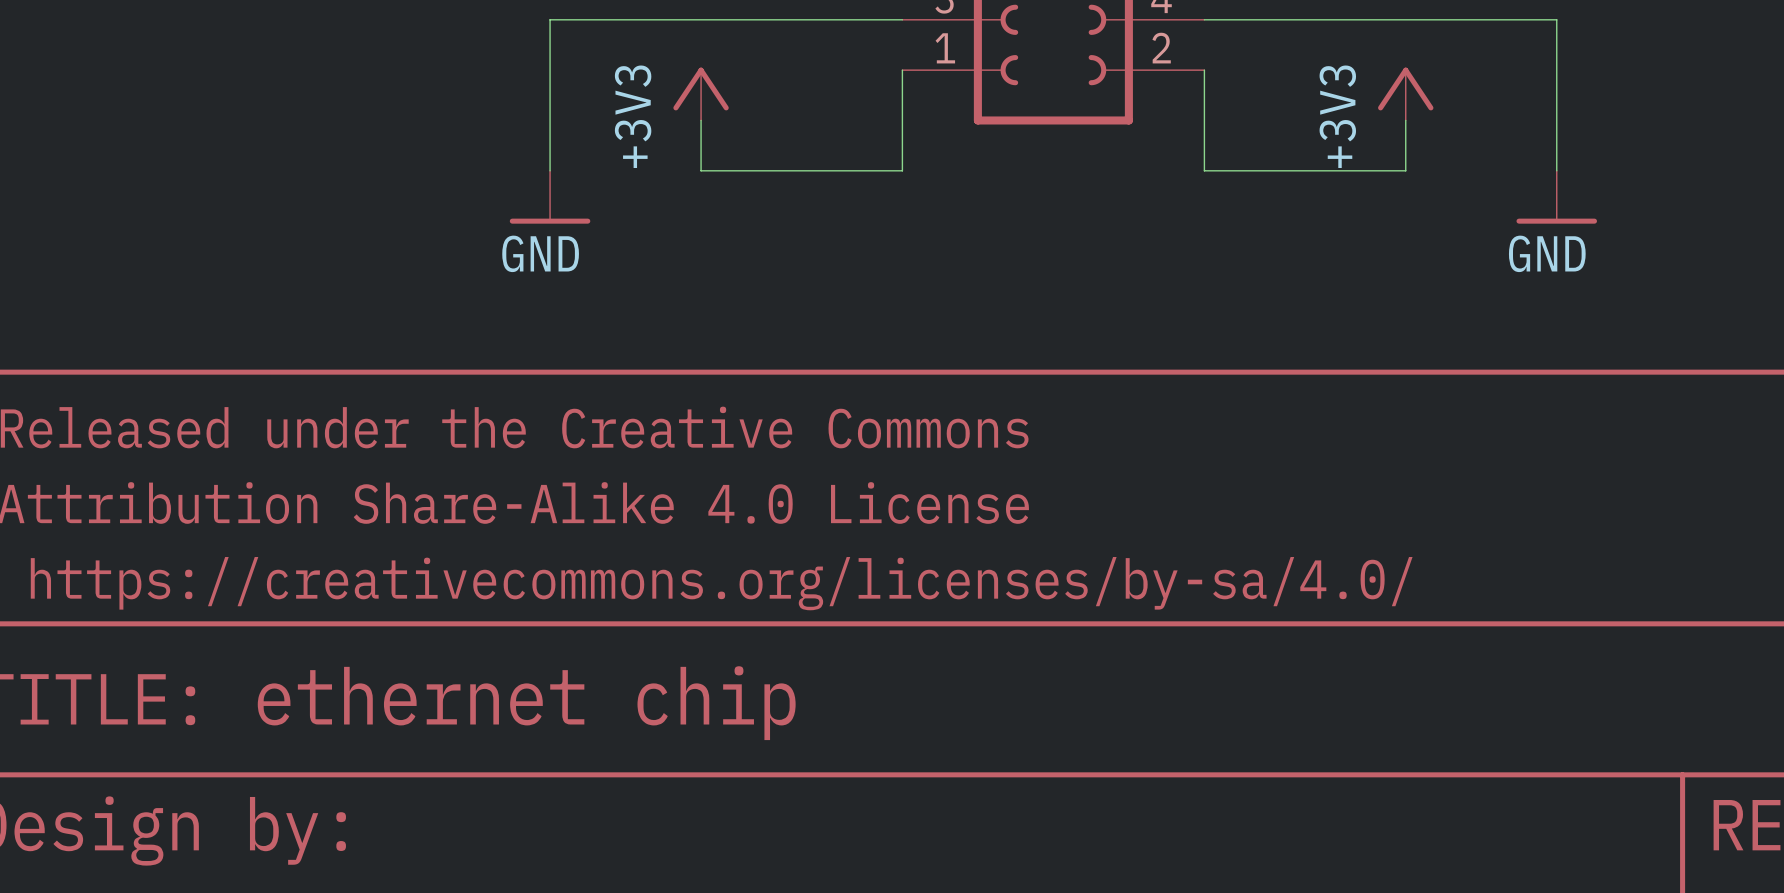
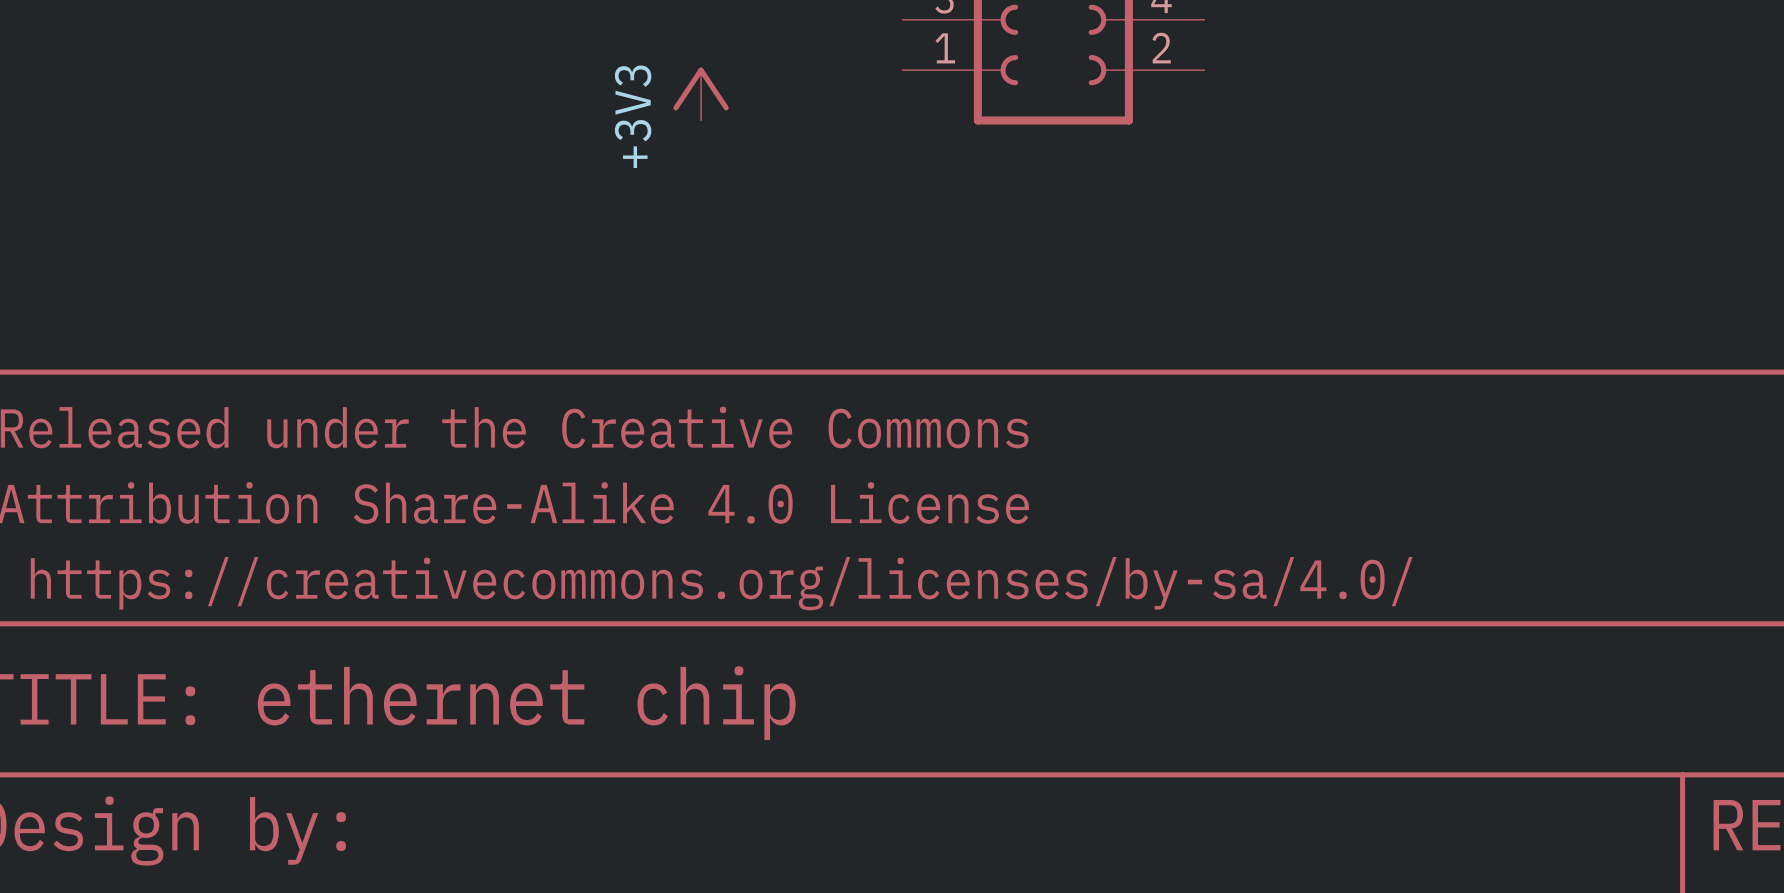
wire: (902, 19) (550, 19) (550, 170) -> none
wire: (1204, 19) (1556, 19) (1556, 170) -> none
wire: (902, 70) (902, 170) (701, 170) (701, 120) -> none
wire: (1204, 70) (1204, 170) (1405, 170) (1405, 120) -> none
power symbol: +3V3 (1405, 94) -> none
power symbol: GND (550, 197) -> none
power symbol: GND (1556, 197) -> none

